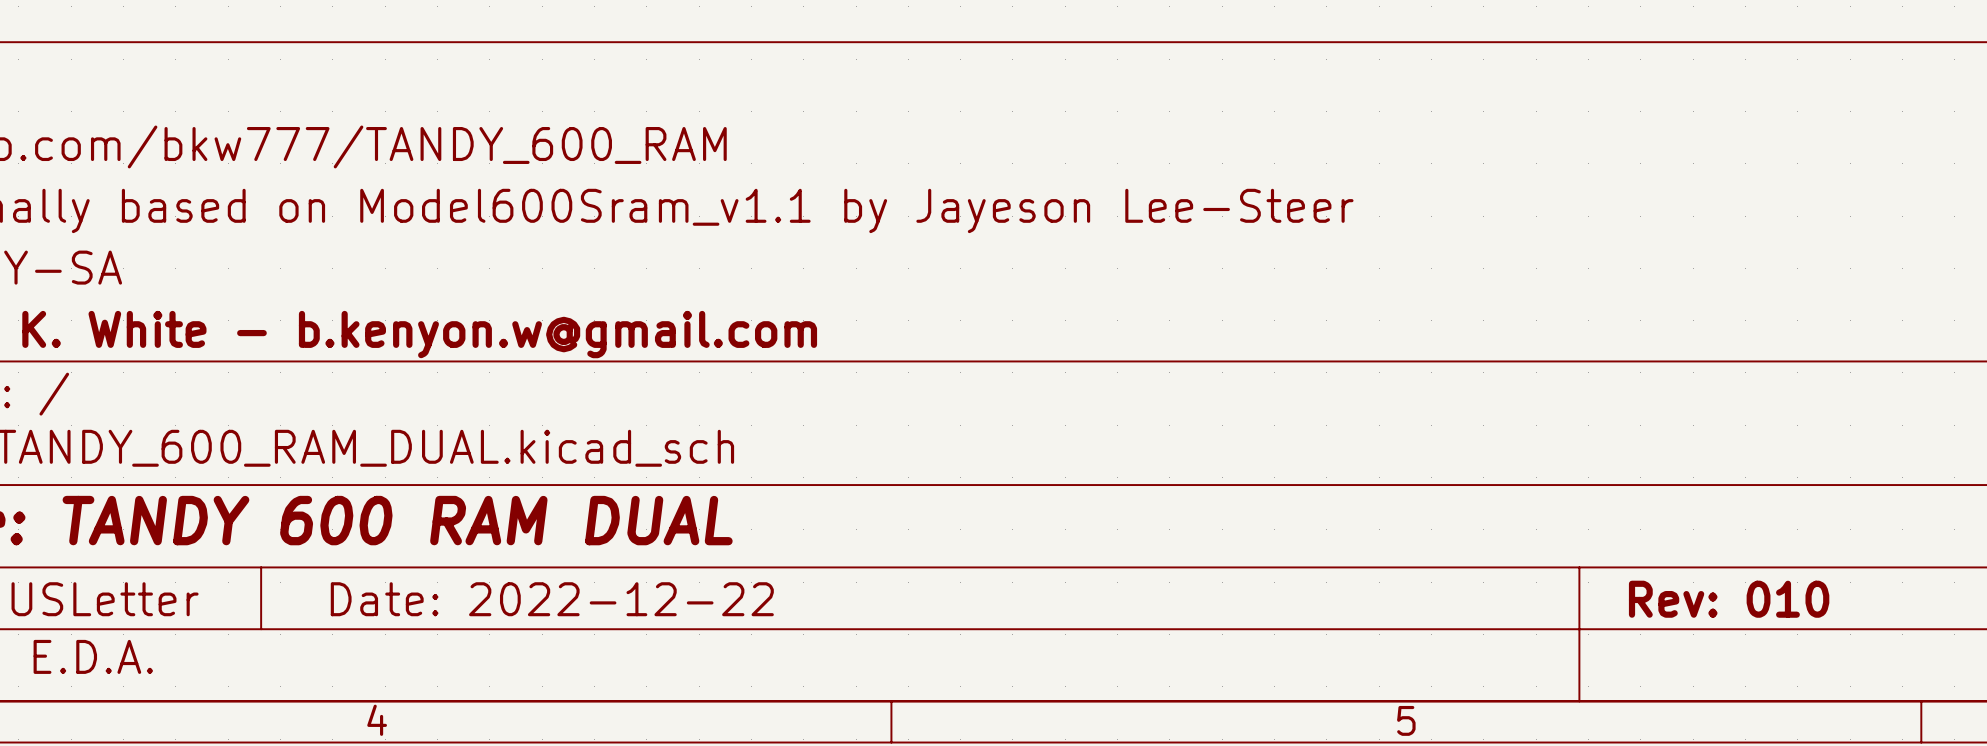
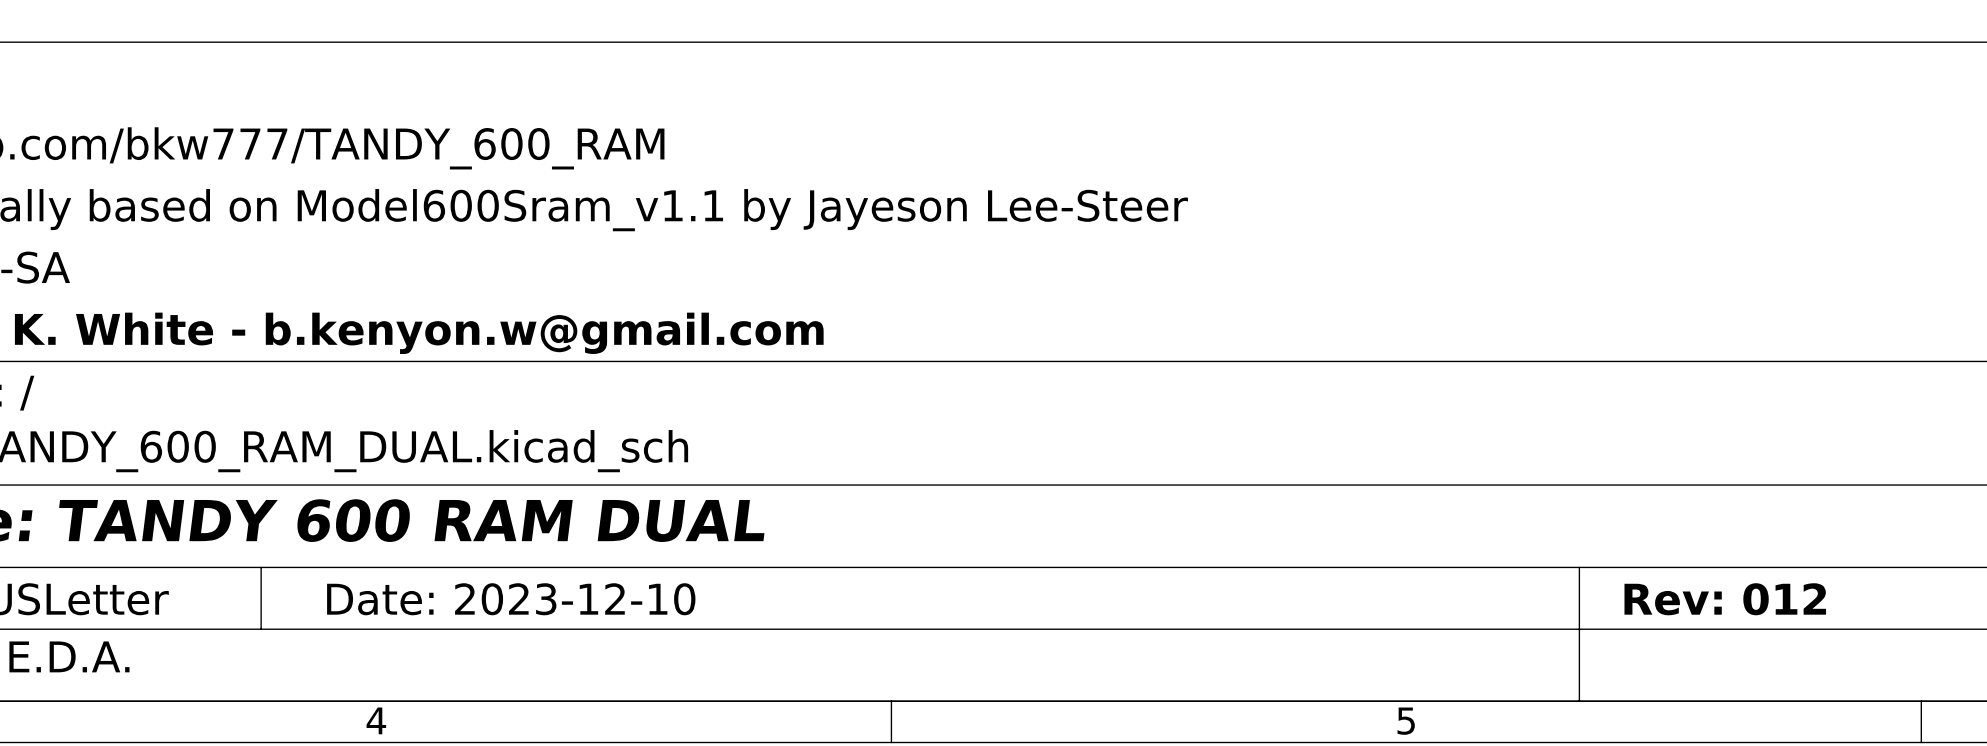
title block: Date: 2022-12-22 (552, 599) -> Date: 2023-12-10 (511, 599)
title block: Rev: 010 (1729, 599) -> Rev: 012 (1725, 599)

